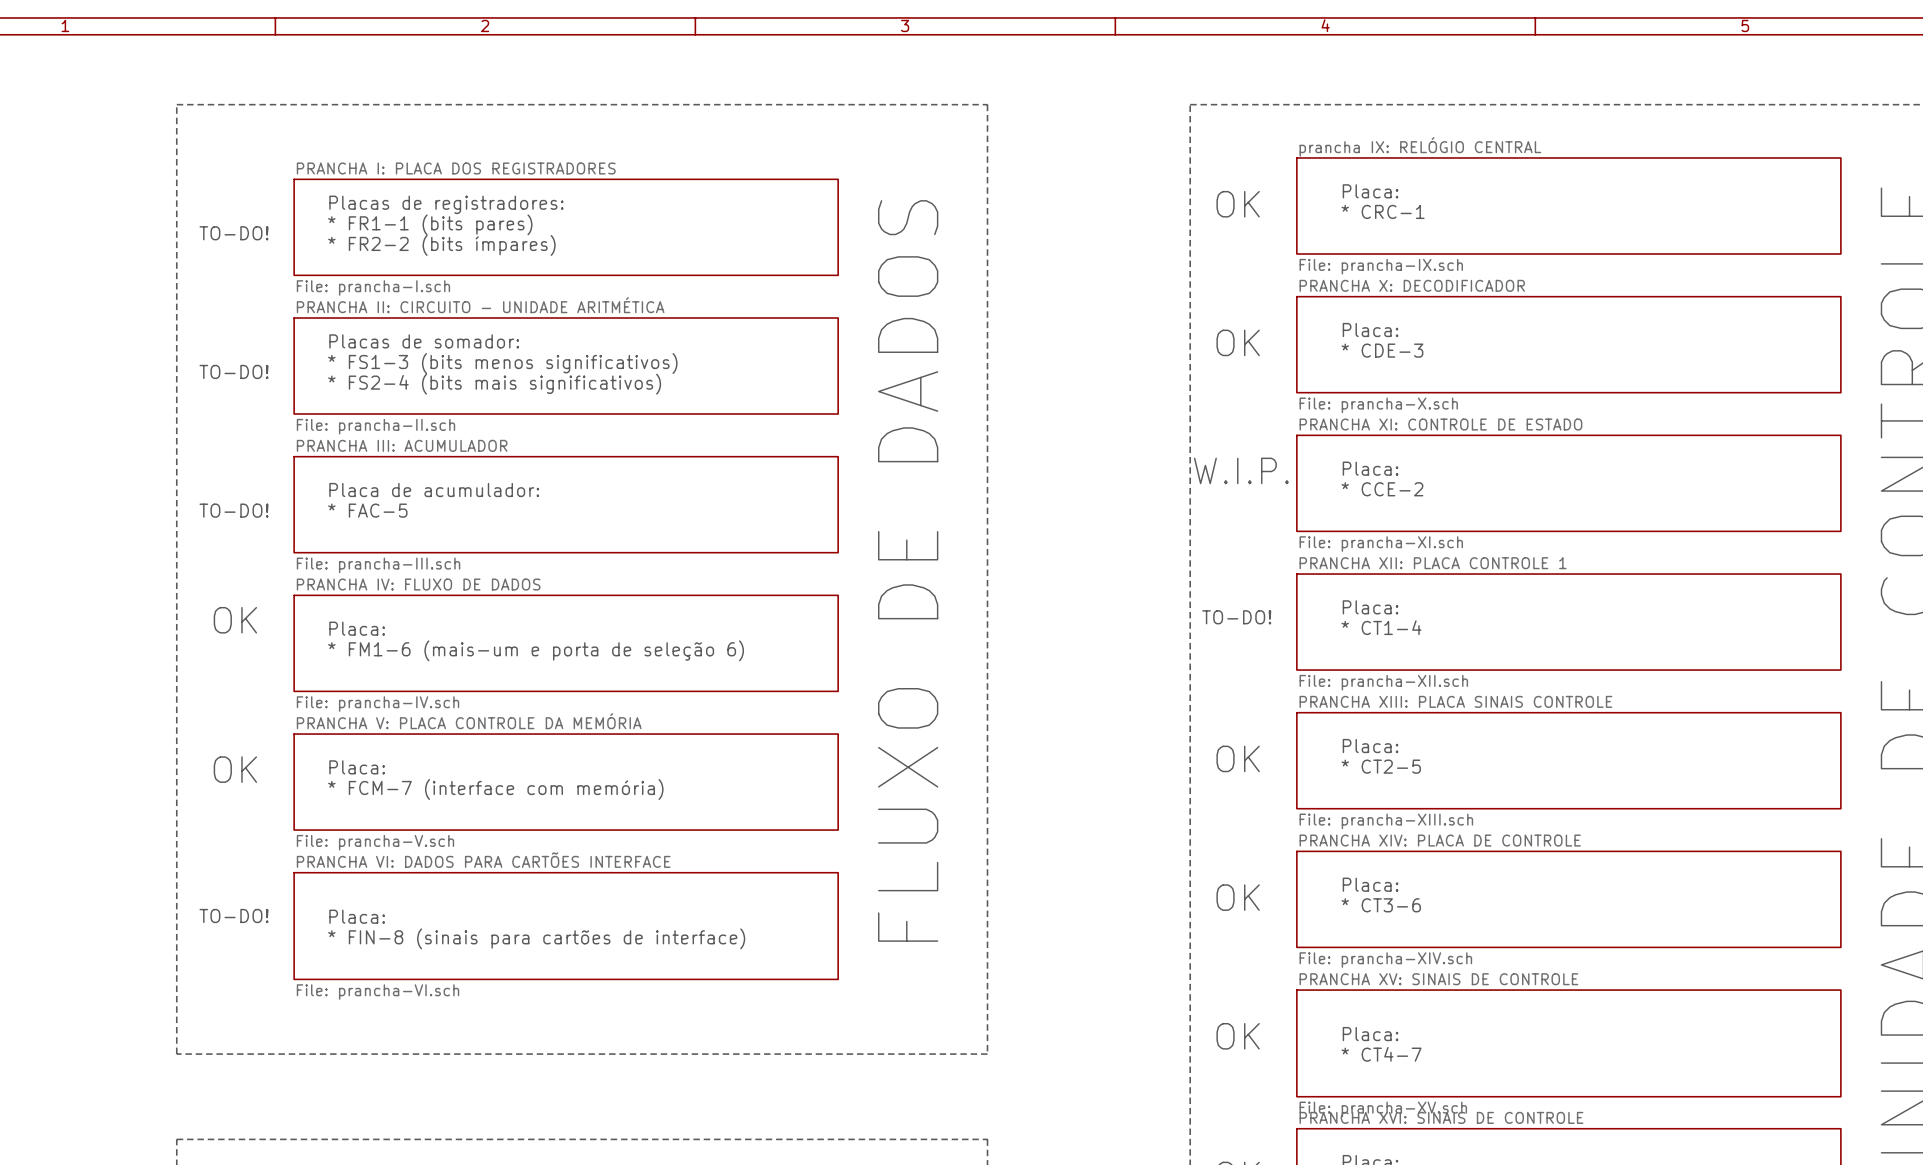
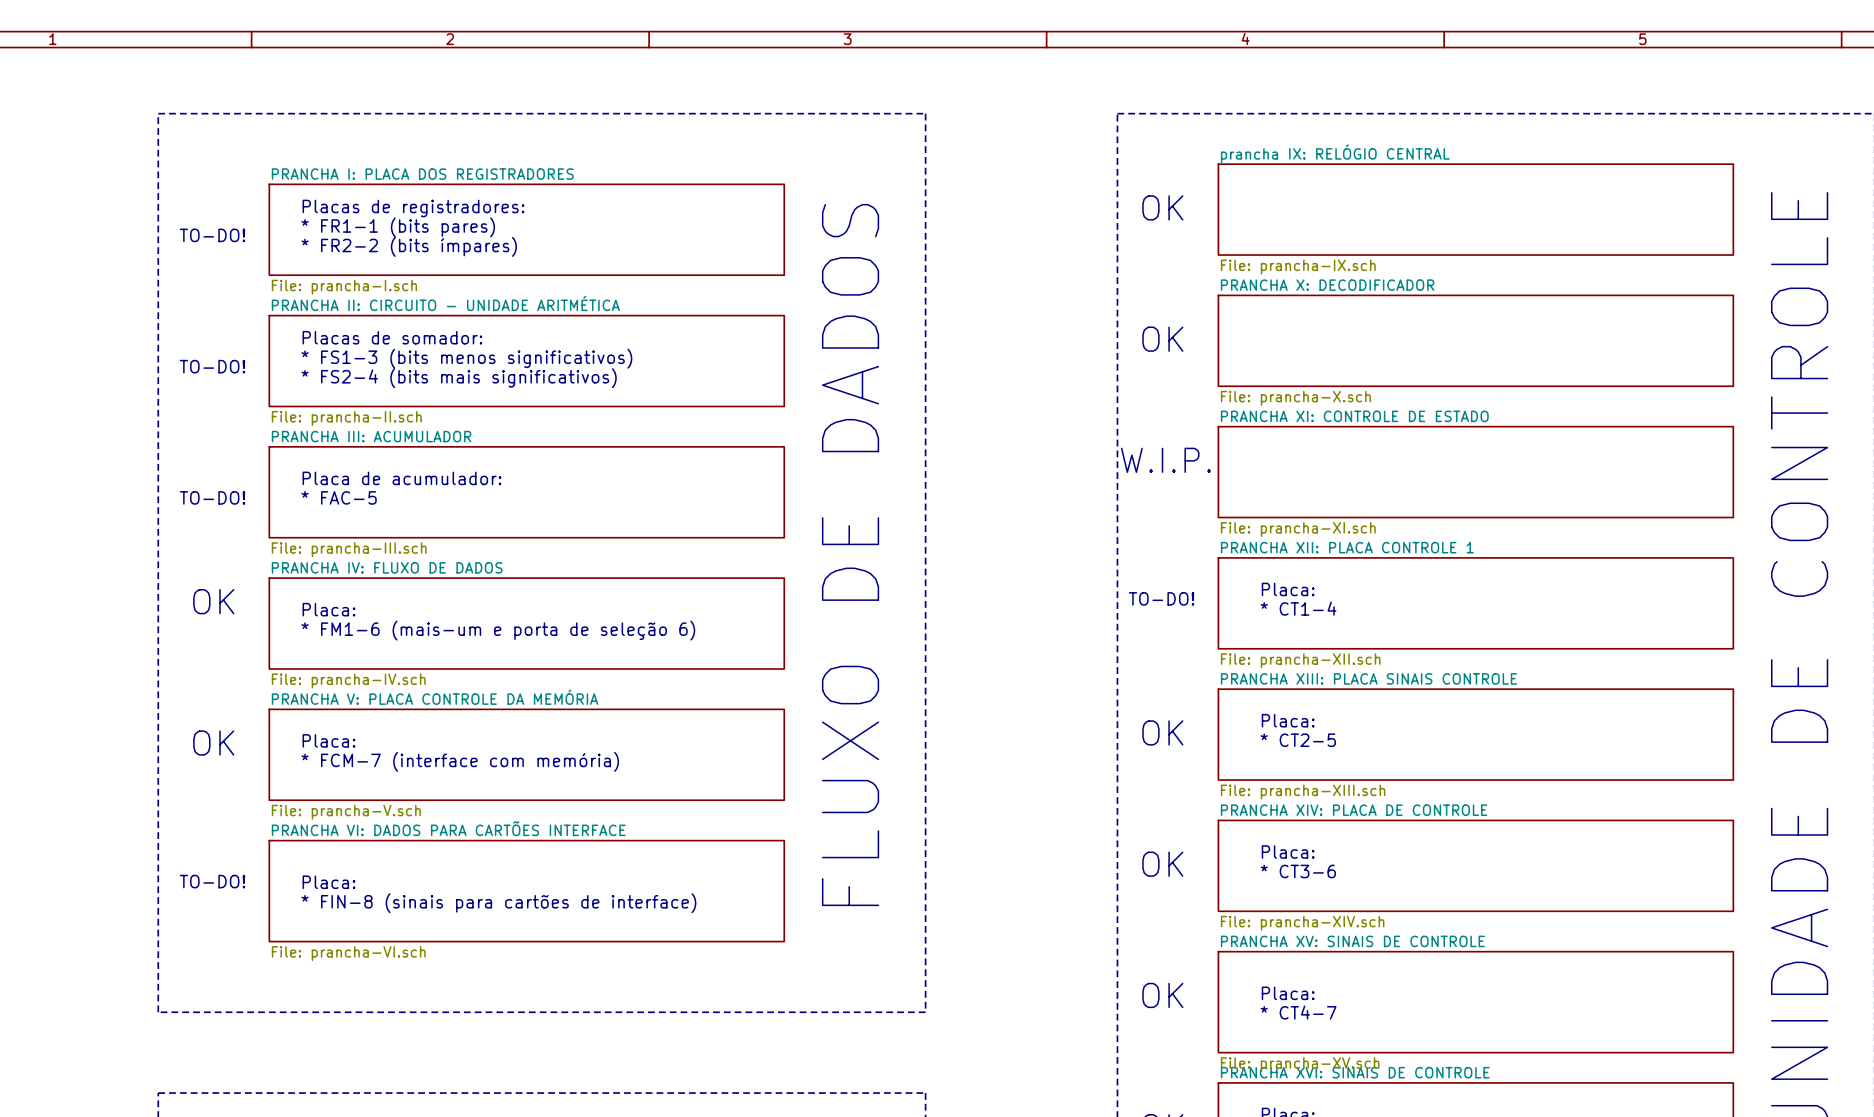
text: Placa: (1370, 191) -> none
text: * CRC-1 (1383, 211) -> none
text: Placa: (1370, 330) -> none
text: * CDE-3 (1382, 350) -> none
text: Placa: (1370, 468) -> none
text: * CCE-2 (1382, 489) -> none

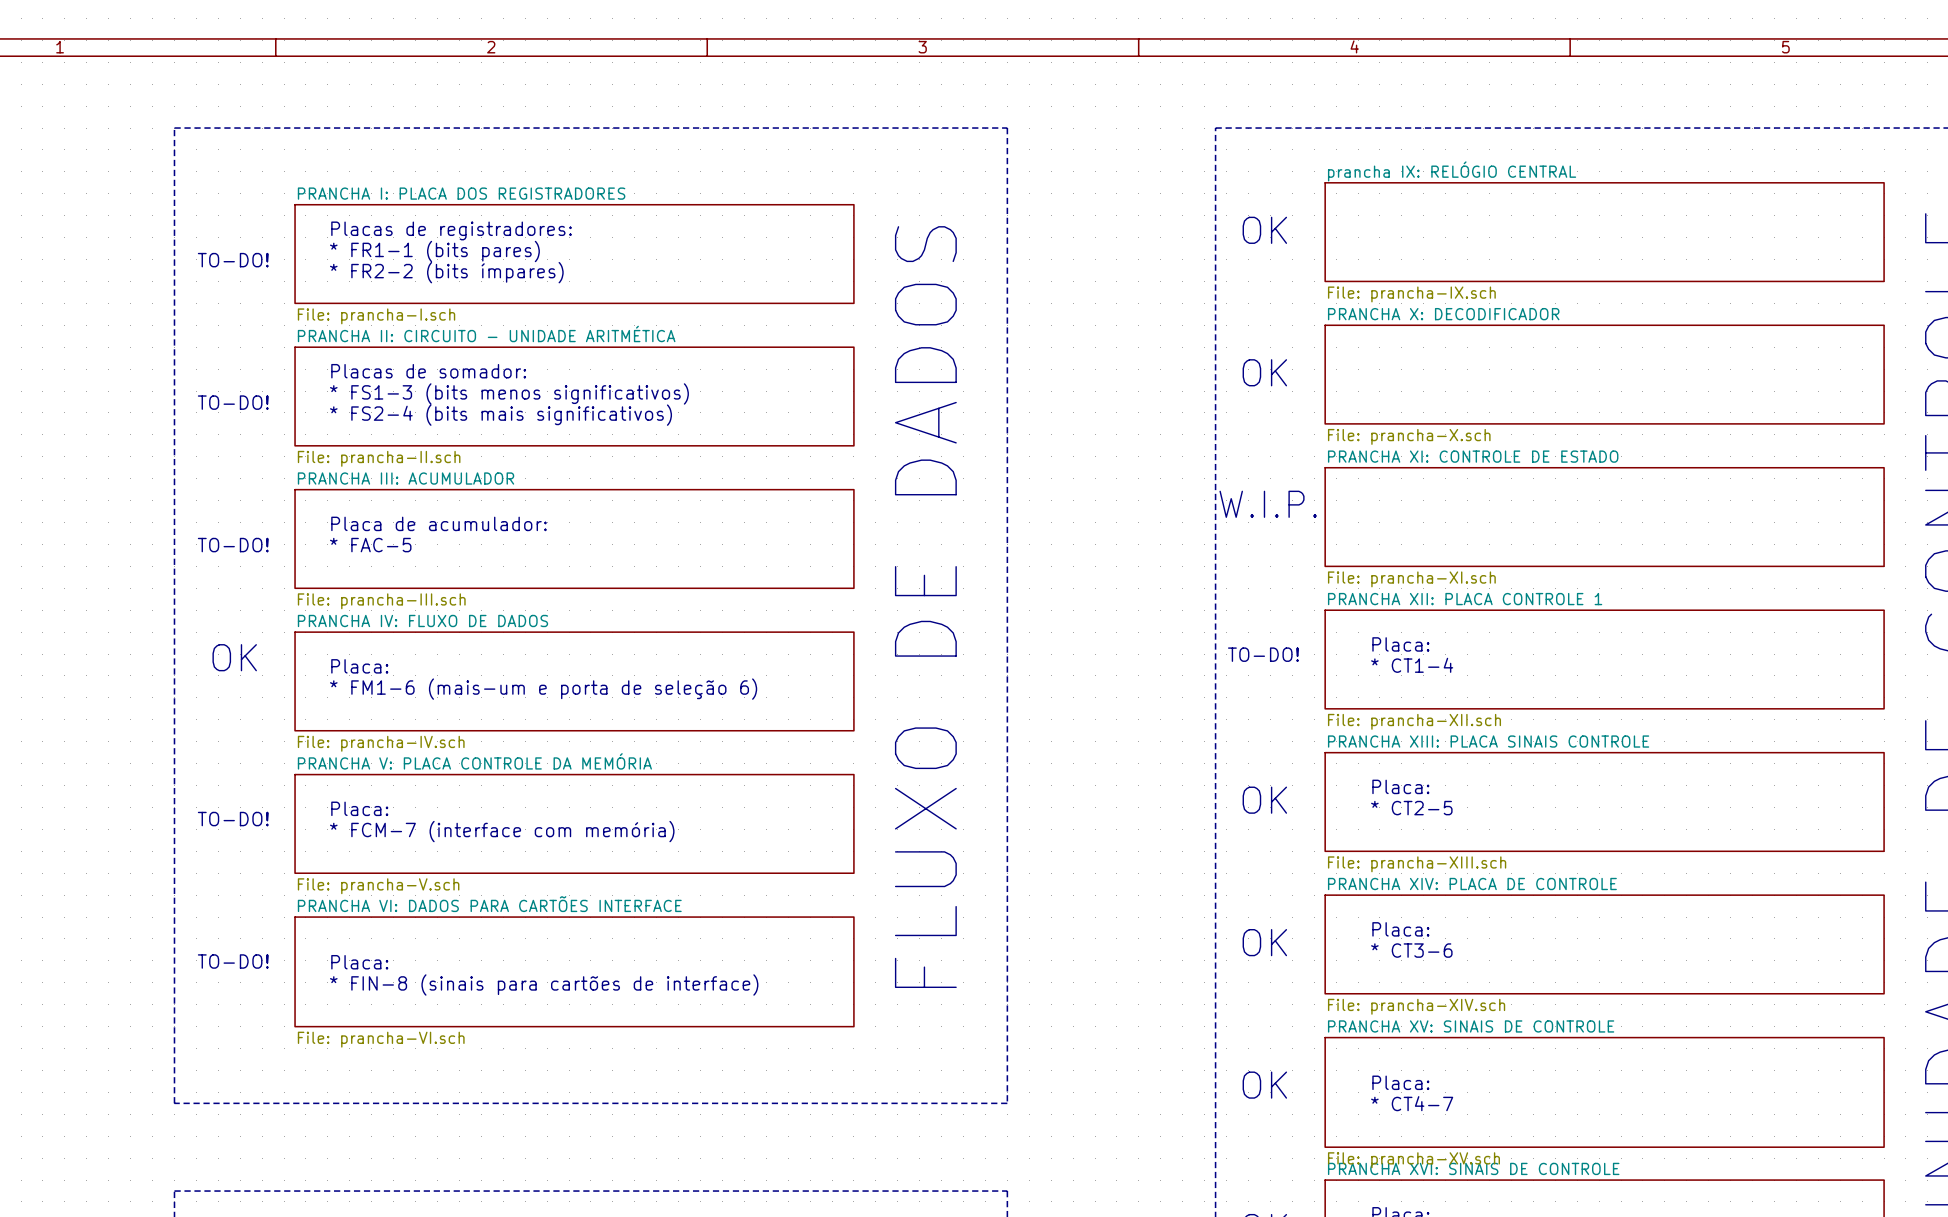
text: OK (213, 743) -> none
text: none -> TO-DO! (233, 819)

